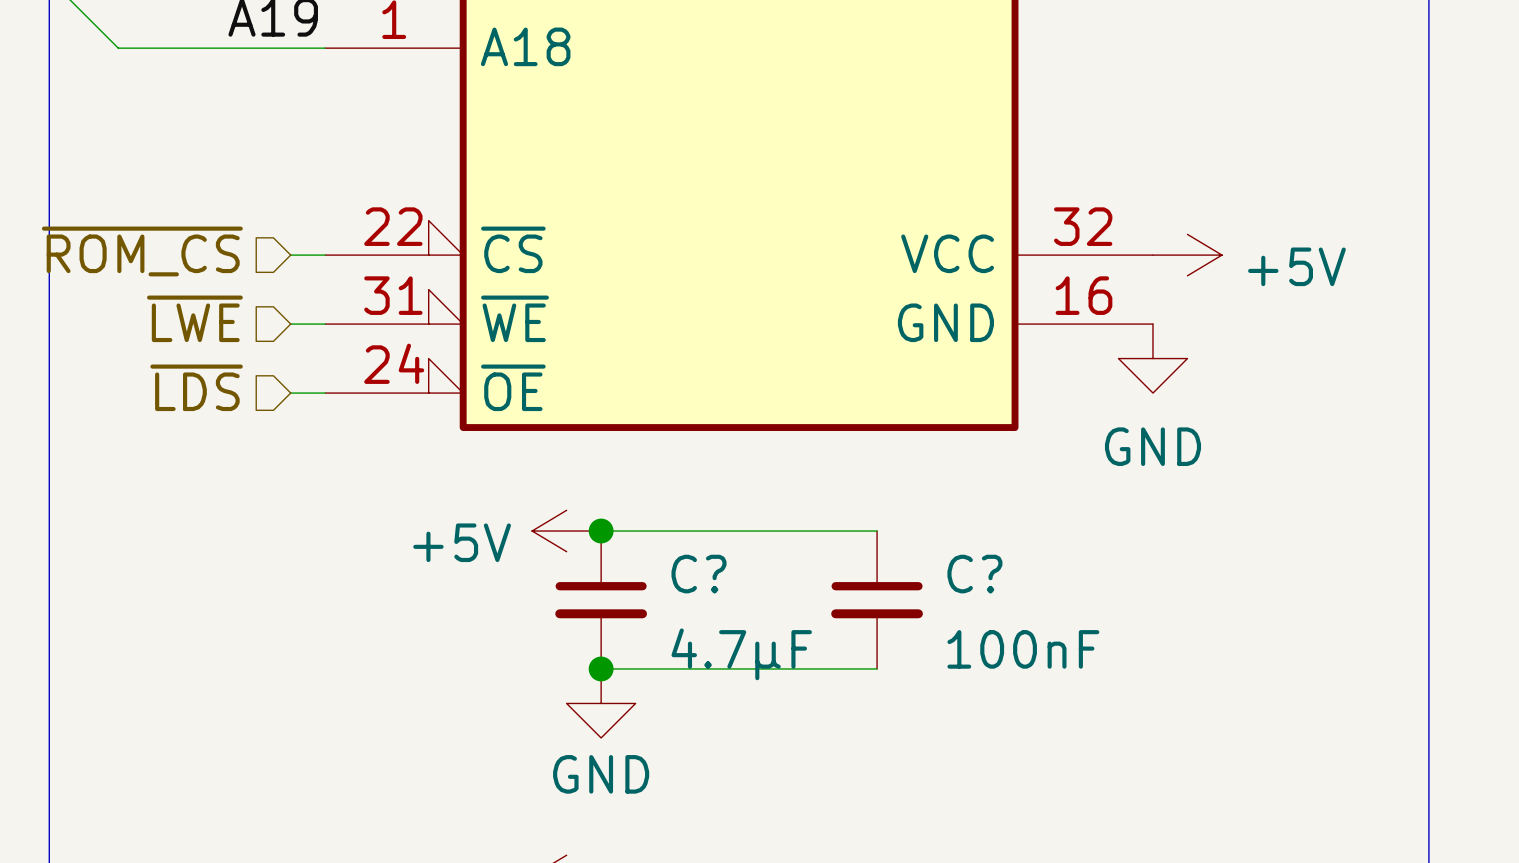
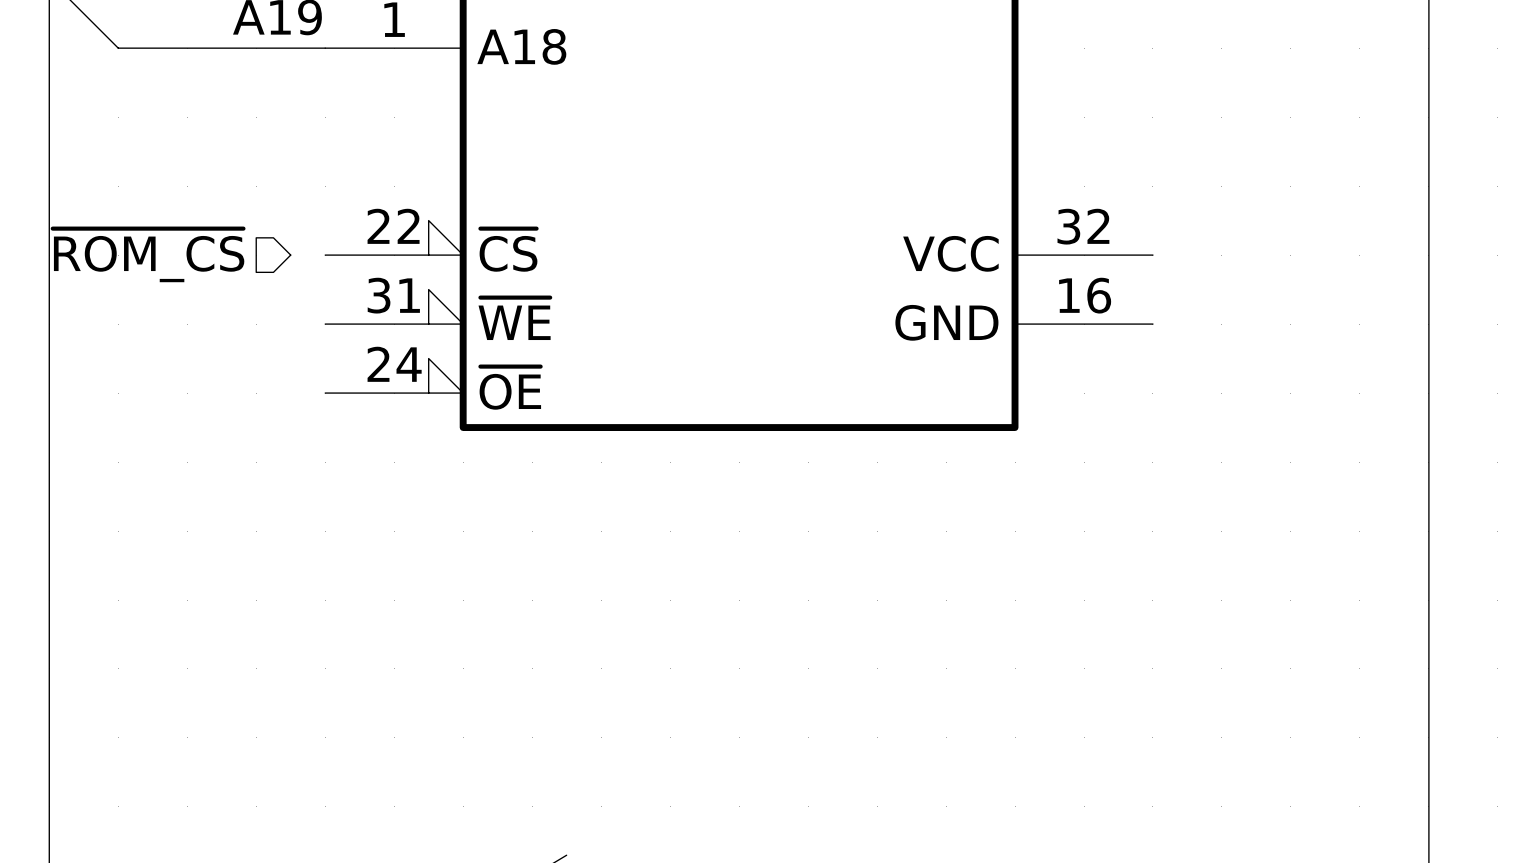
wire: (290, 255) (325, 255) -> none
power symbol: +5V (1187, 255) -> none
hierarchical label: ~{LWE} (194, 318) -> none
wire: (290, 324) (325, 324) -> none
power symbol: GND (1152, 358) -> none
hierarchical label: ~{LDS} (196, 387) -> none
wire: (290, 393) (325, 393) -> none
power symbol: +5V (566, 531) -> none
wire: (601, 531) (877, 531) -> none
junction: (601, 531) -> none
C?: 4.7µF (601, 600) -> none
C?: 100nF (877, 600) -> none
wire: (601, 668) (877, 668) -> none
junction: (601, 668) -> none
power symbol: GND (601, 703) -> none

